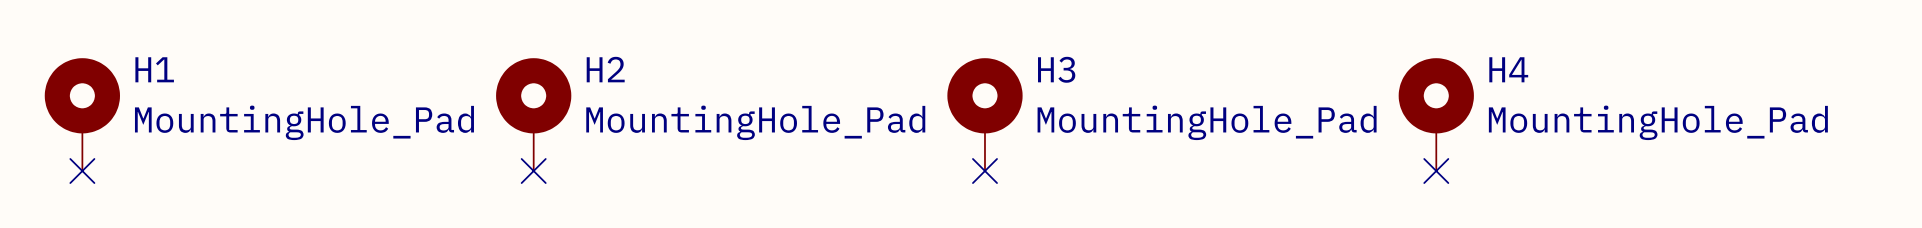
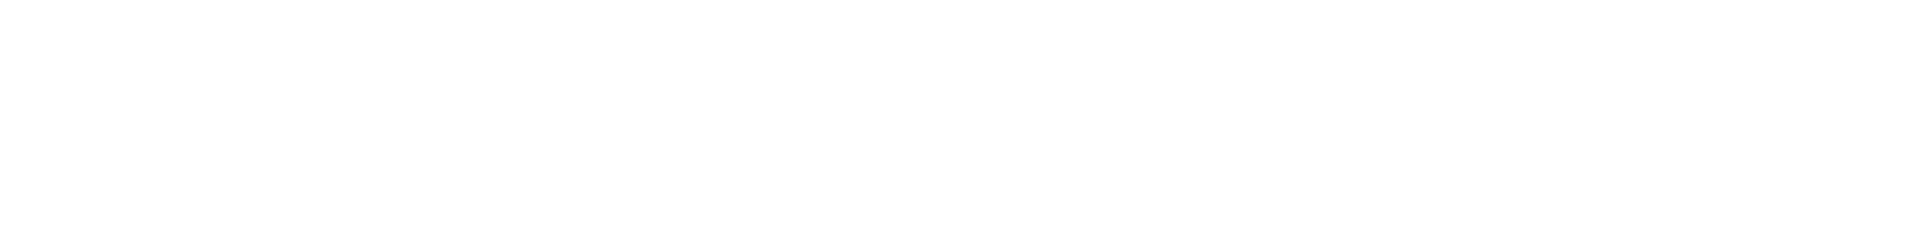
H1: MountingHole_Pad (82, 114) -> none
H2: MountingHole_Pad (533, 114) -> none
H3: MountingHole_Pad (984, 114) -> none
H4: MountingHole_Pad (1436, 114) -> none
no-connect mark: (82, 171) -> none
no-connect mark: (533, 171) -> none
no-connect mark: (984, 171) -> none
no-connect mark: (1436, 171) -> none

